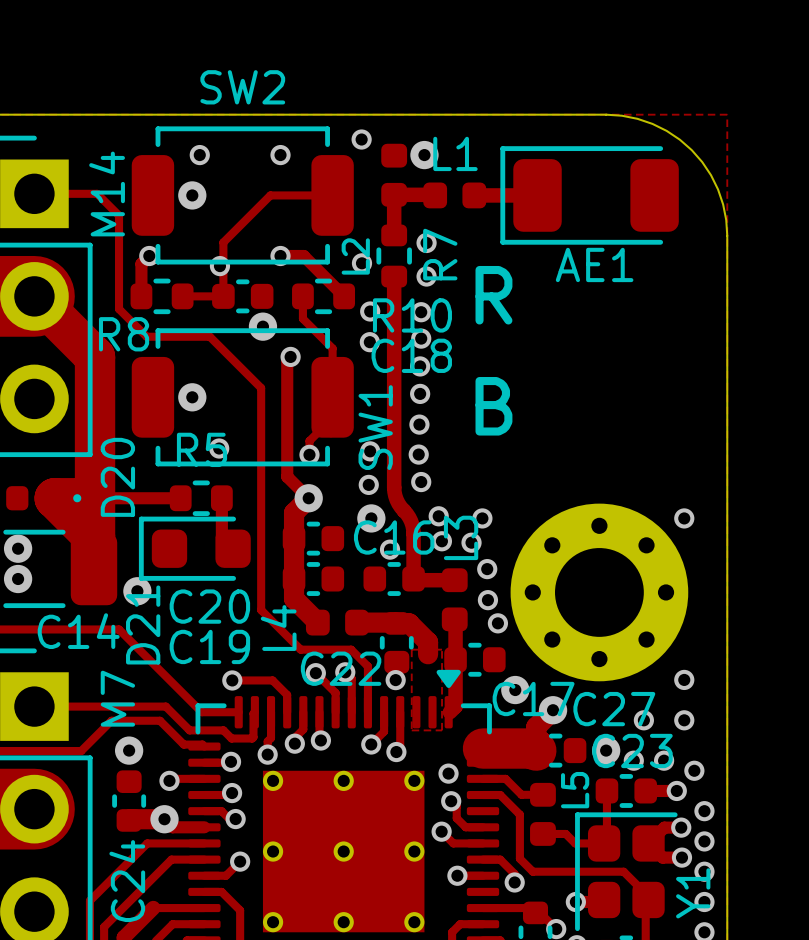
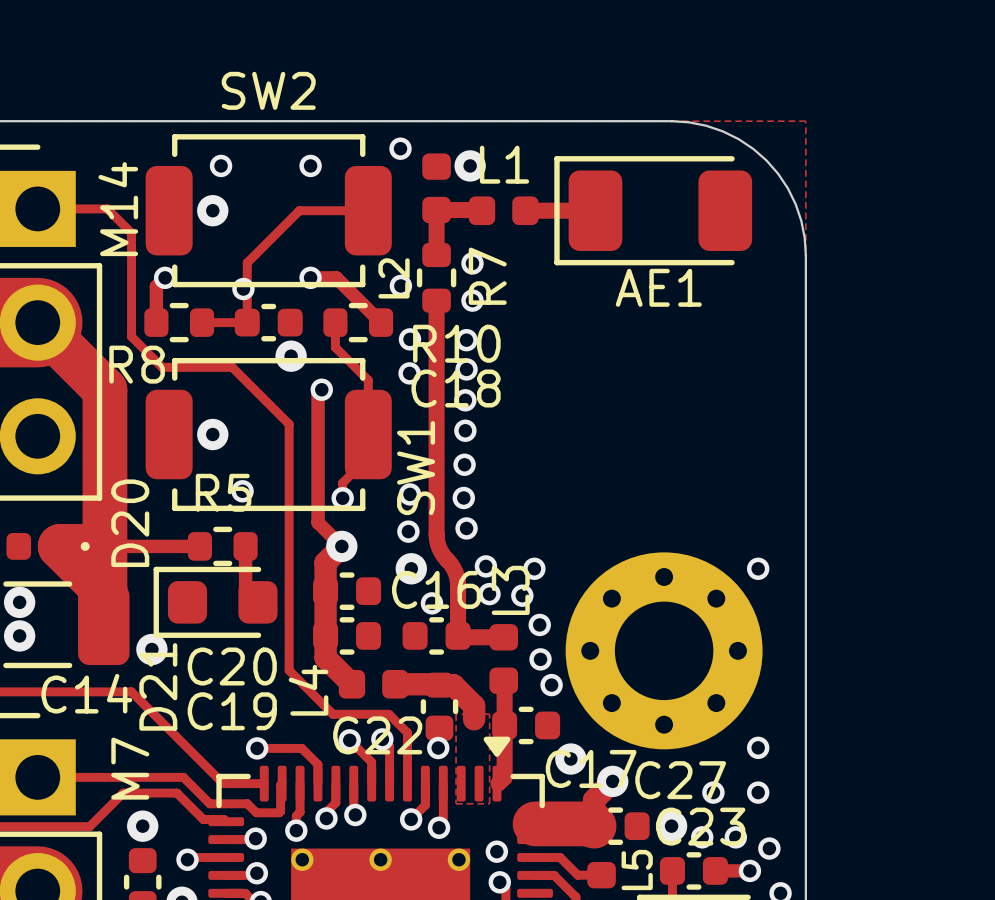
text: R (493, 295) -> none
text: B (493, 406) -> none

